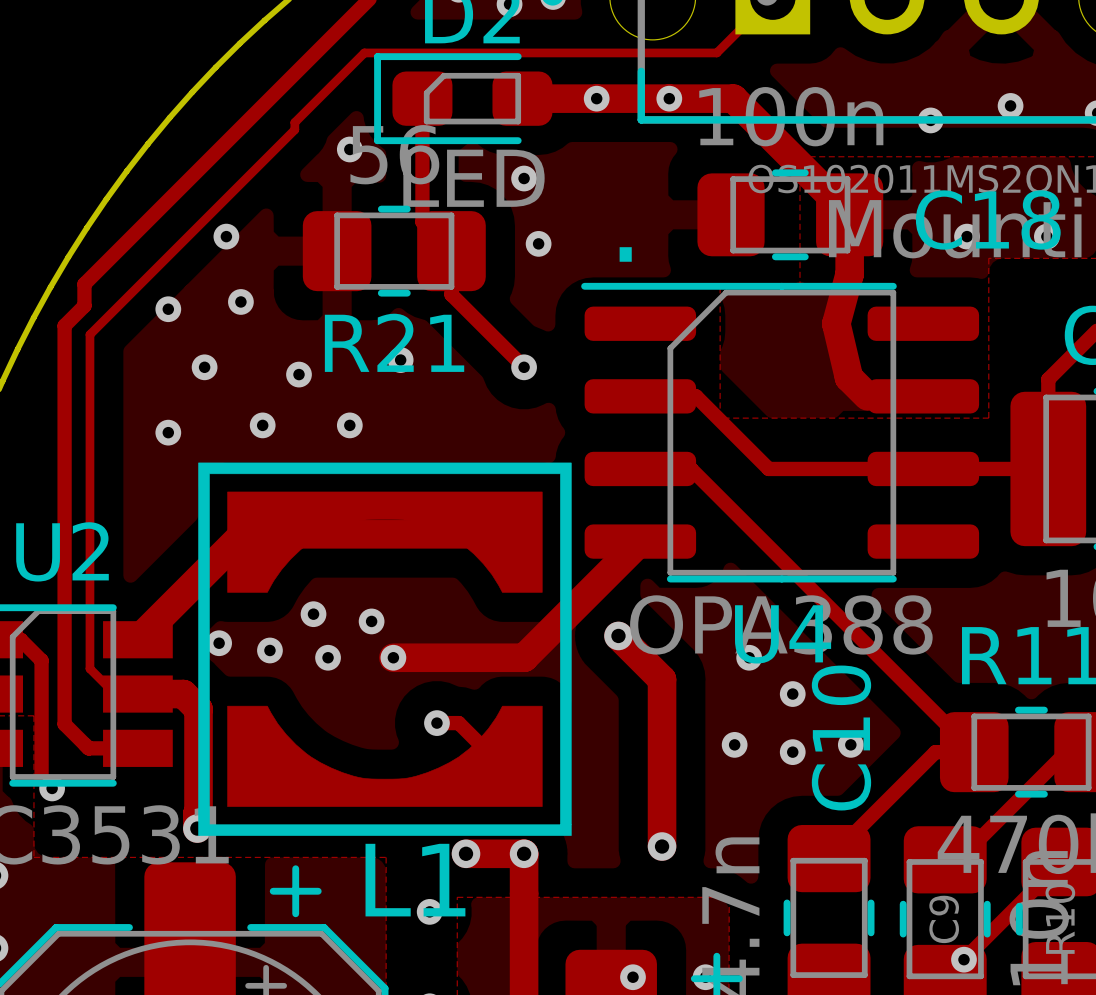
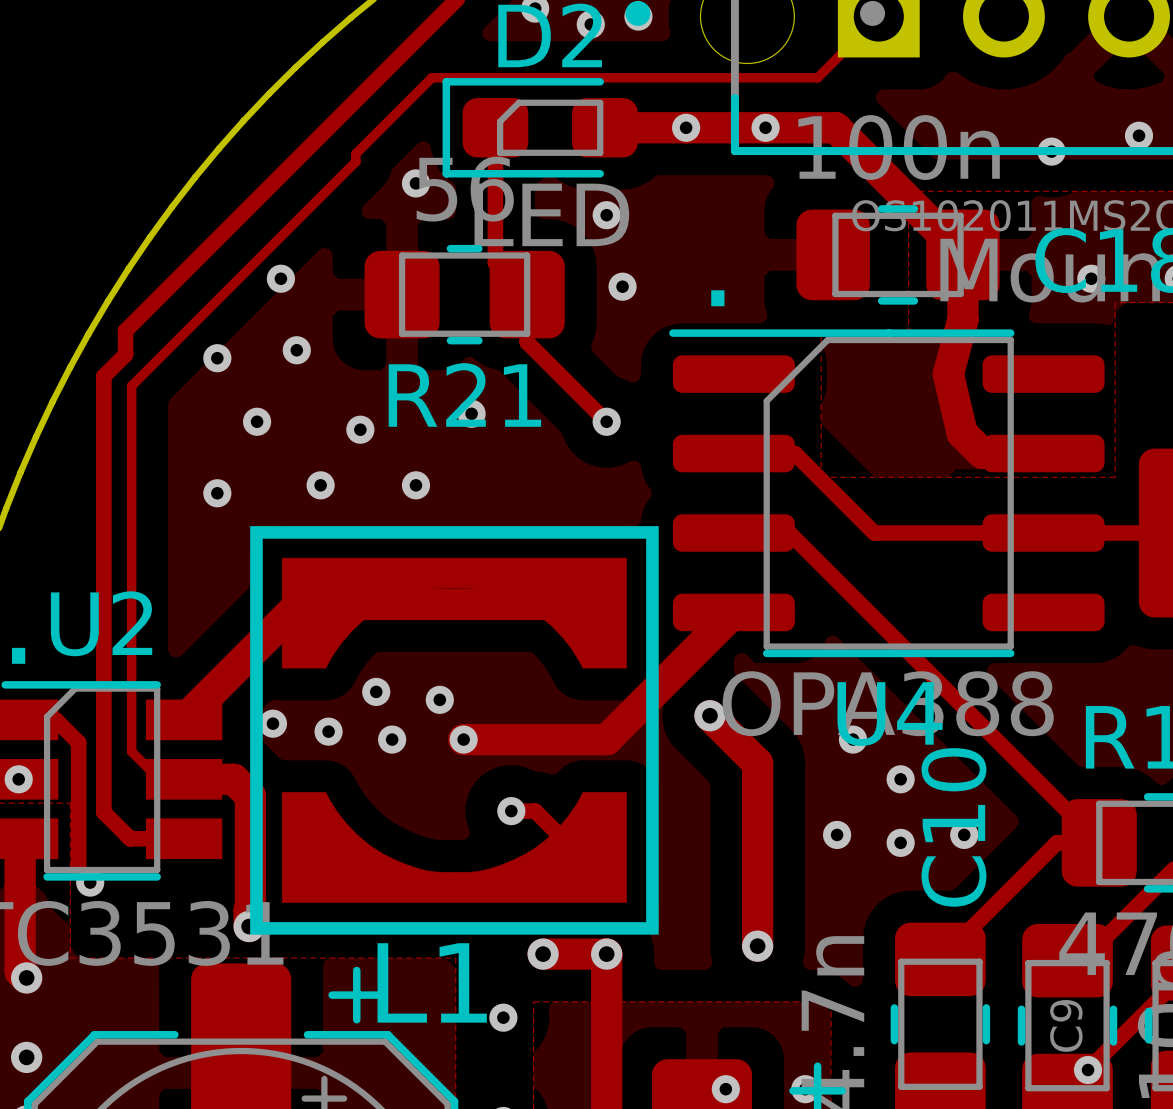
L1 name position: L1 (415, 880) -> L1 (432, 982)

